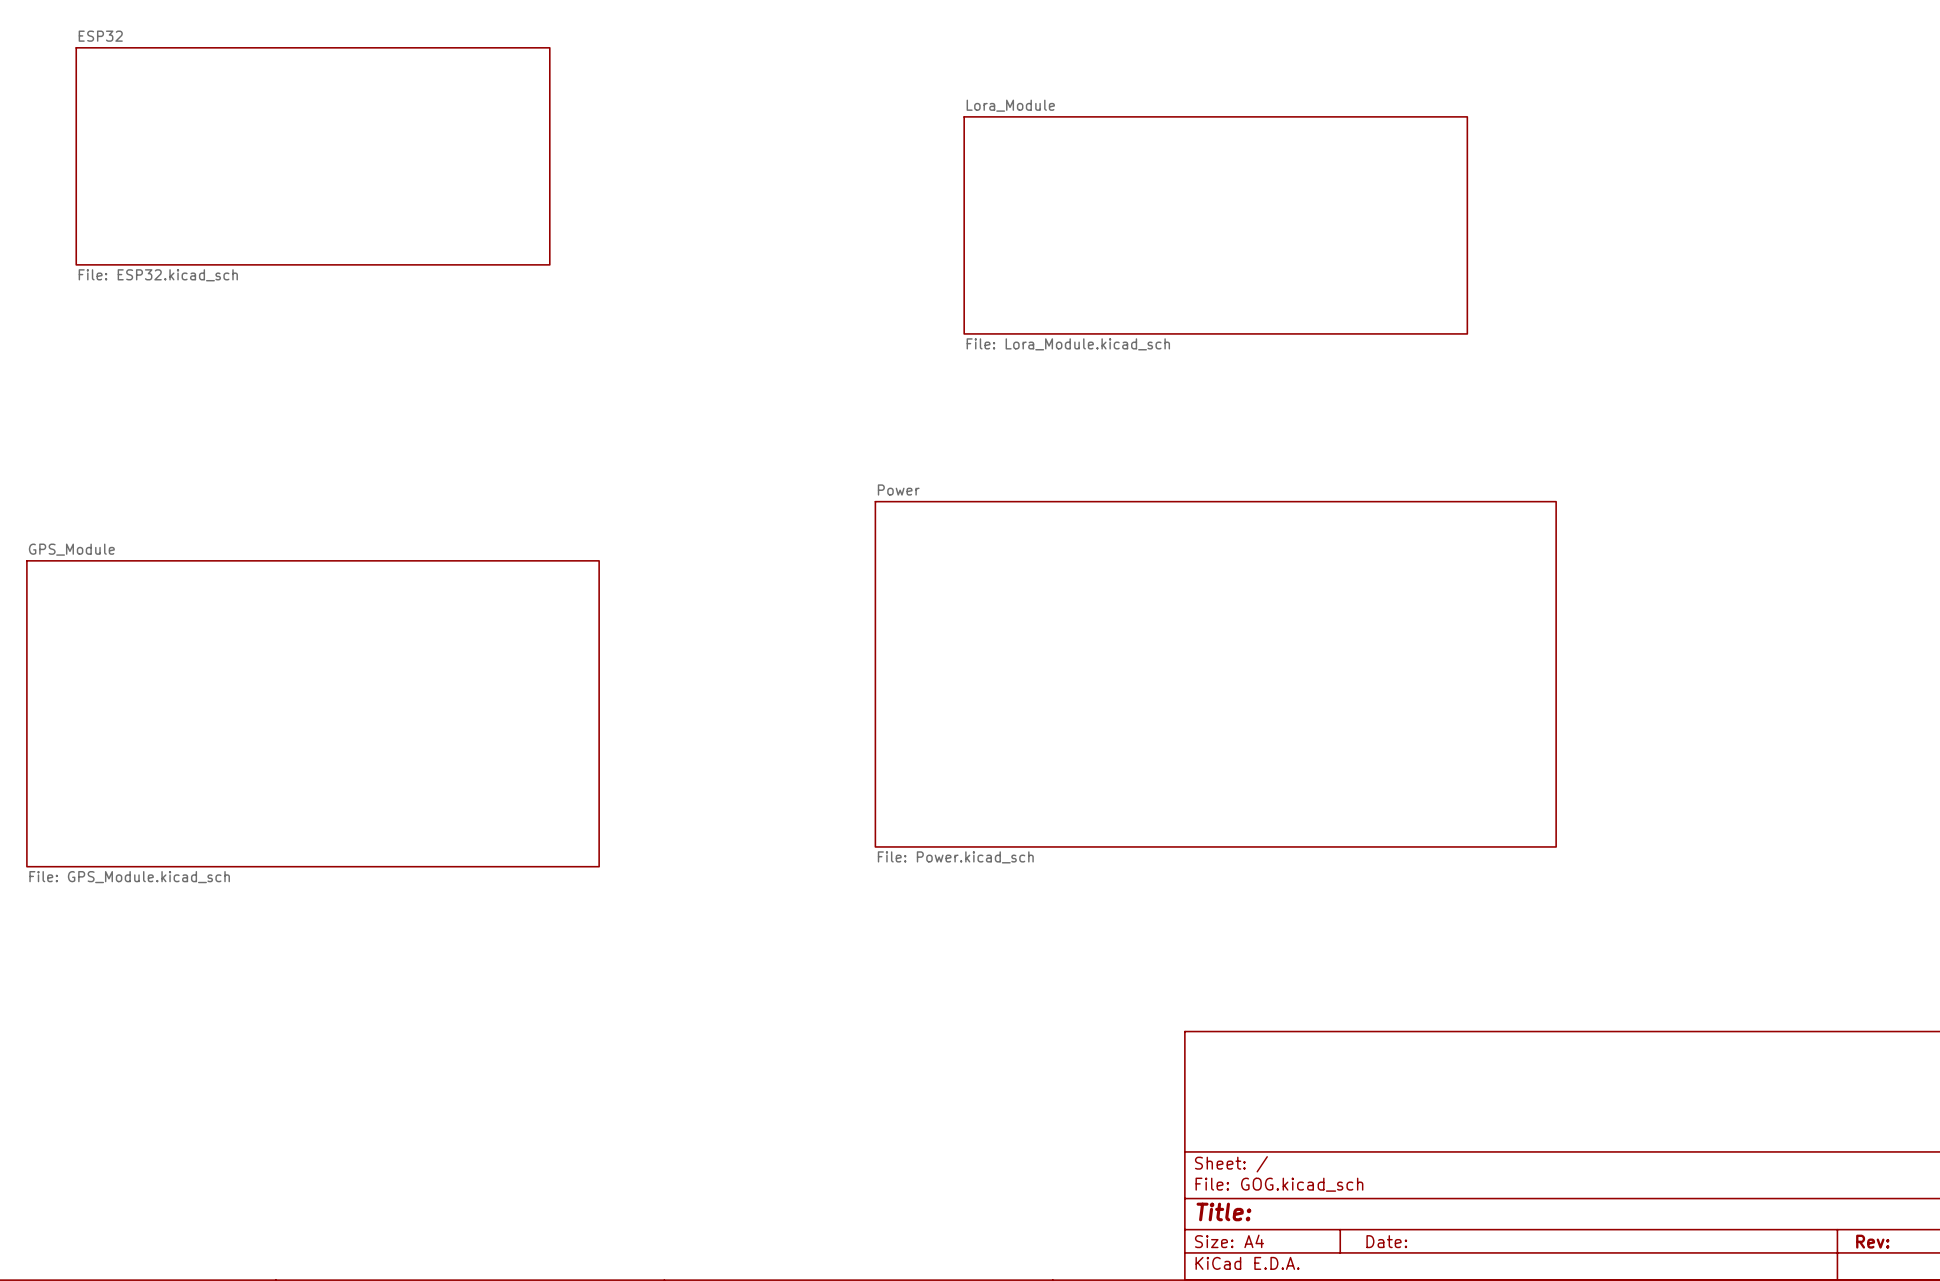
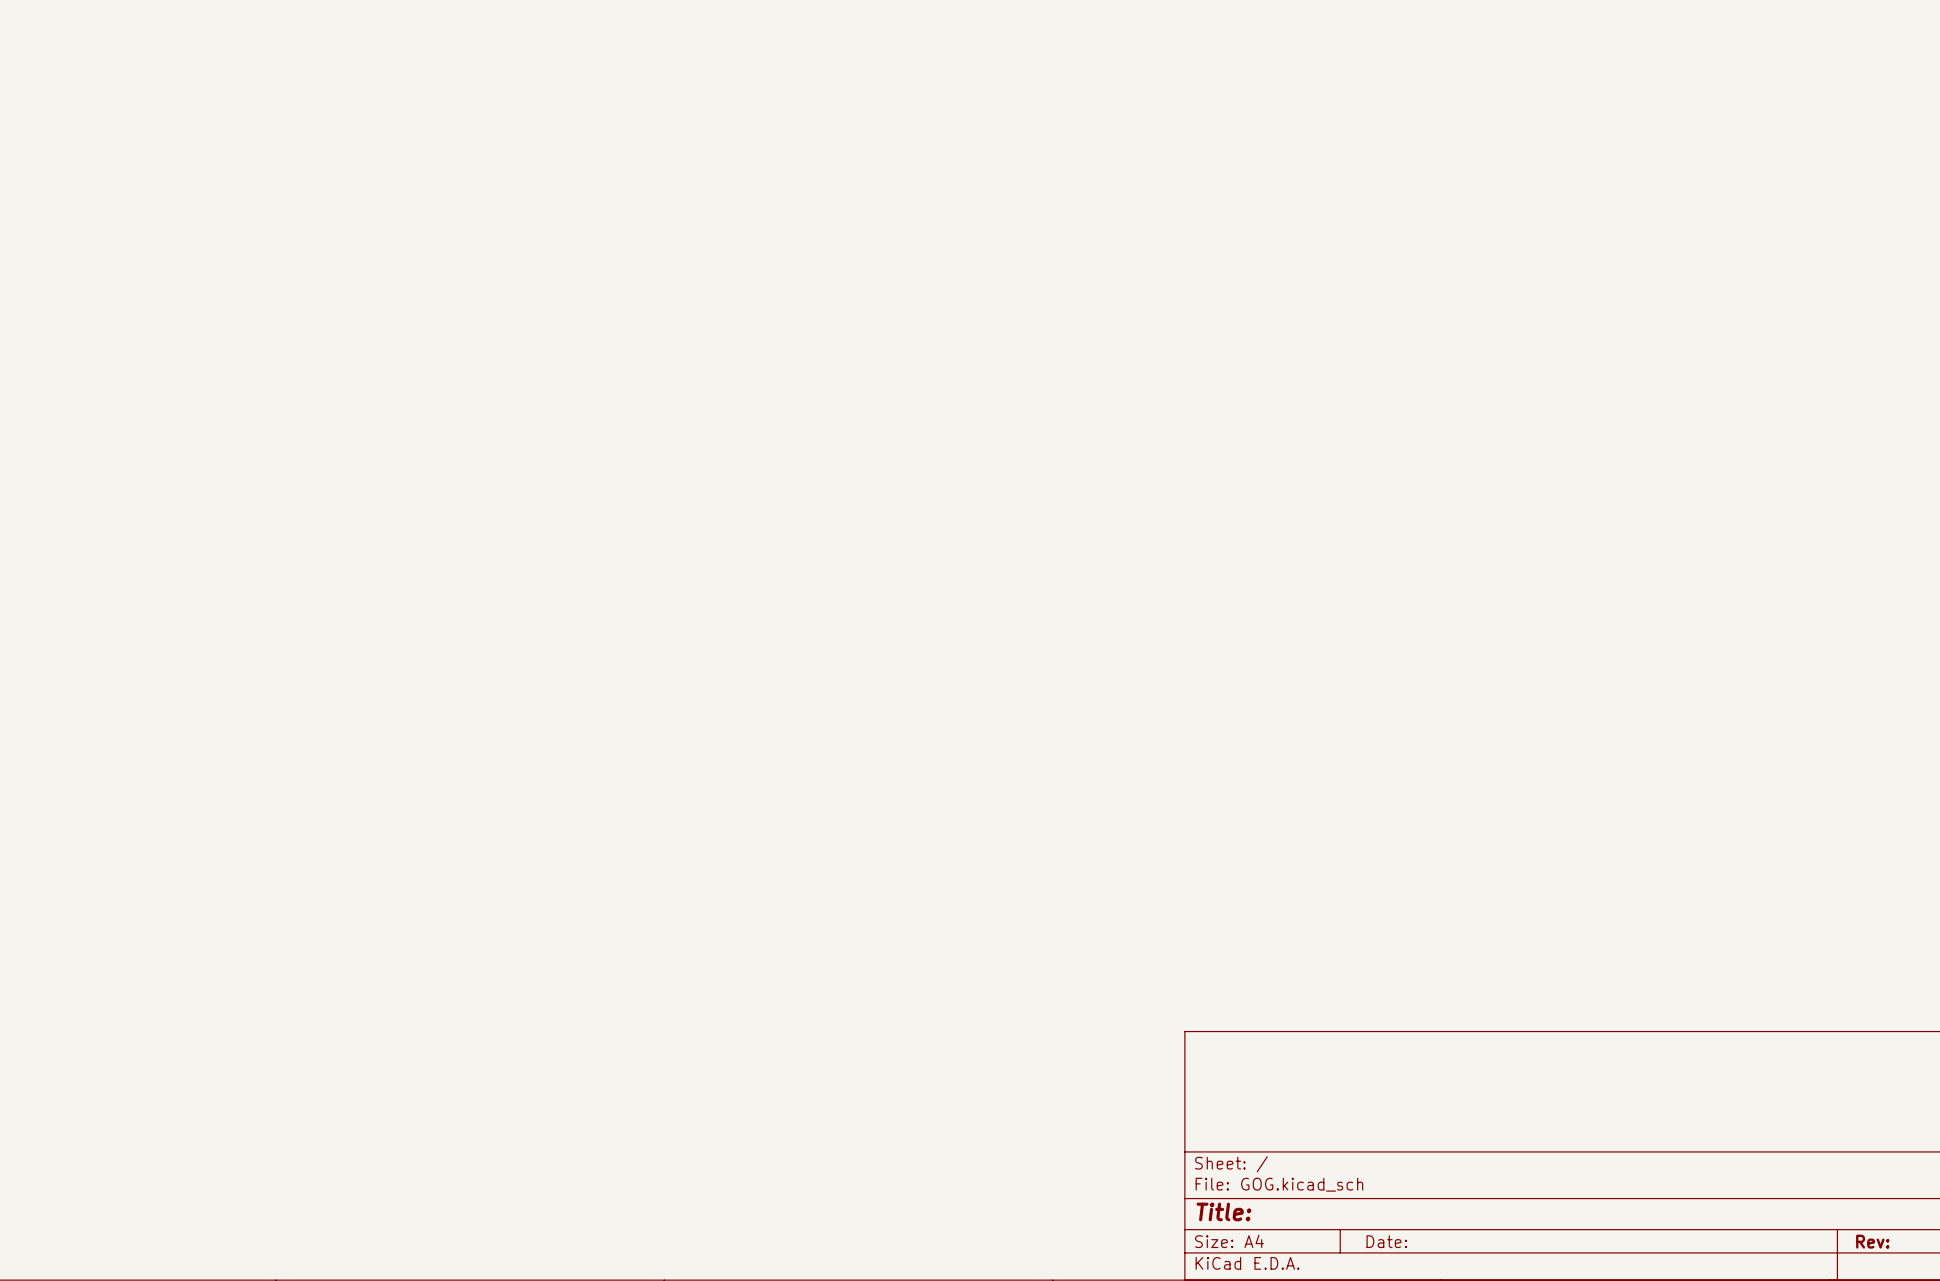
sheet ESP32: File: ESP32.kicad_sch (313, 156) -> none
sheet Lora_Module: File: Lora_Module.kicad_sch (1215, 225) -> none
sheet Power: File: Power.kicad_sch (1215, 674) -> none
sheet GPS_Module: File: GPS_Module.kicad_sch (313, 713) -> none

